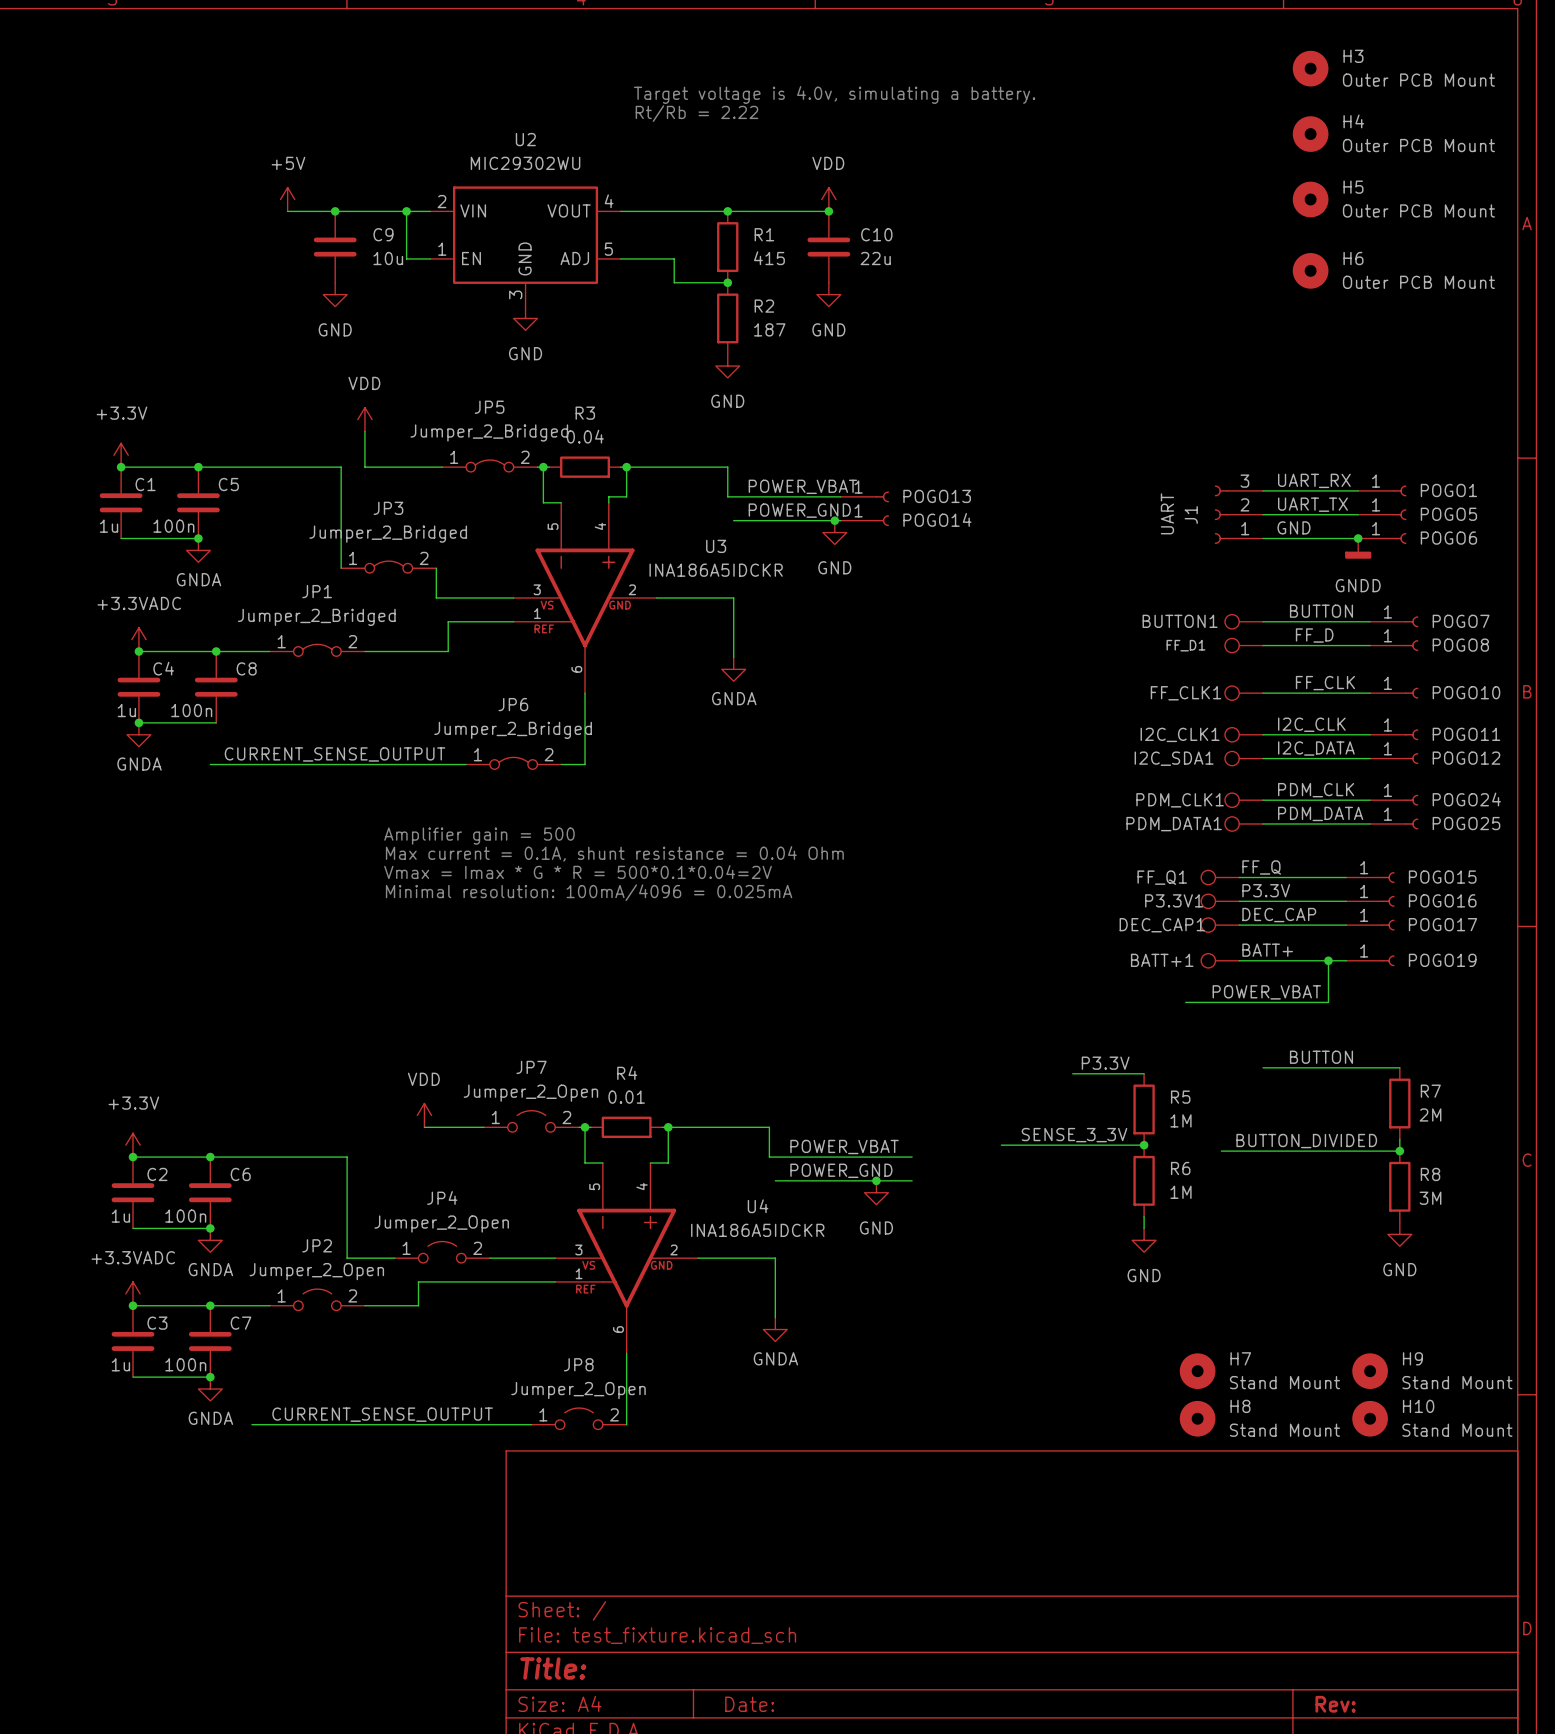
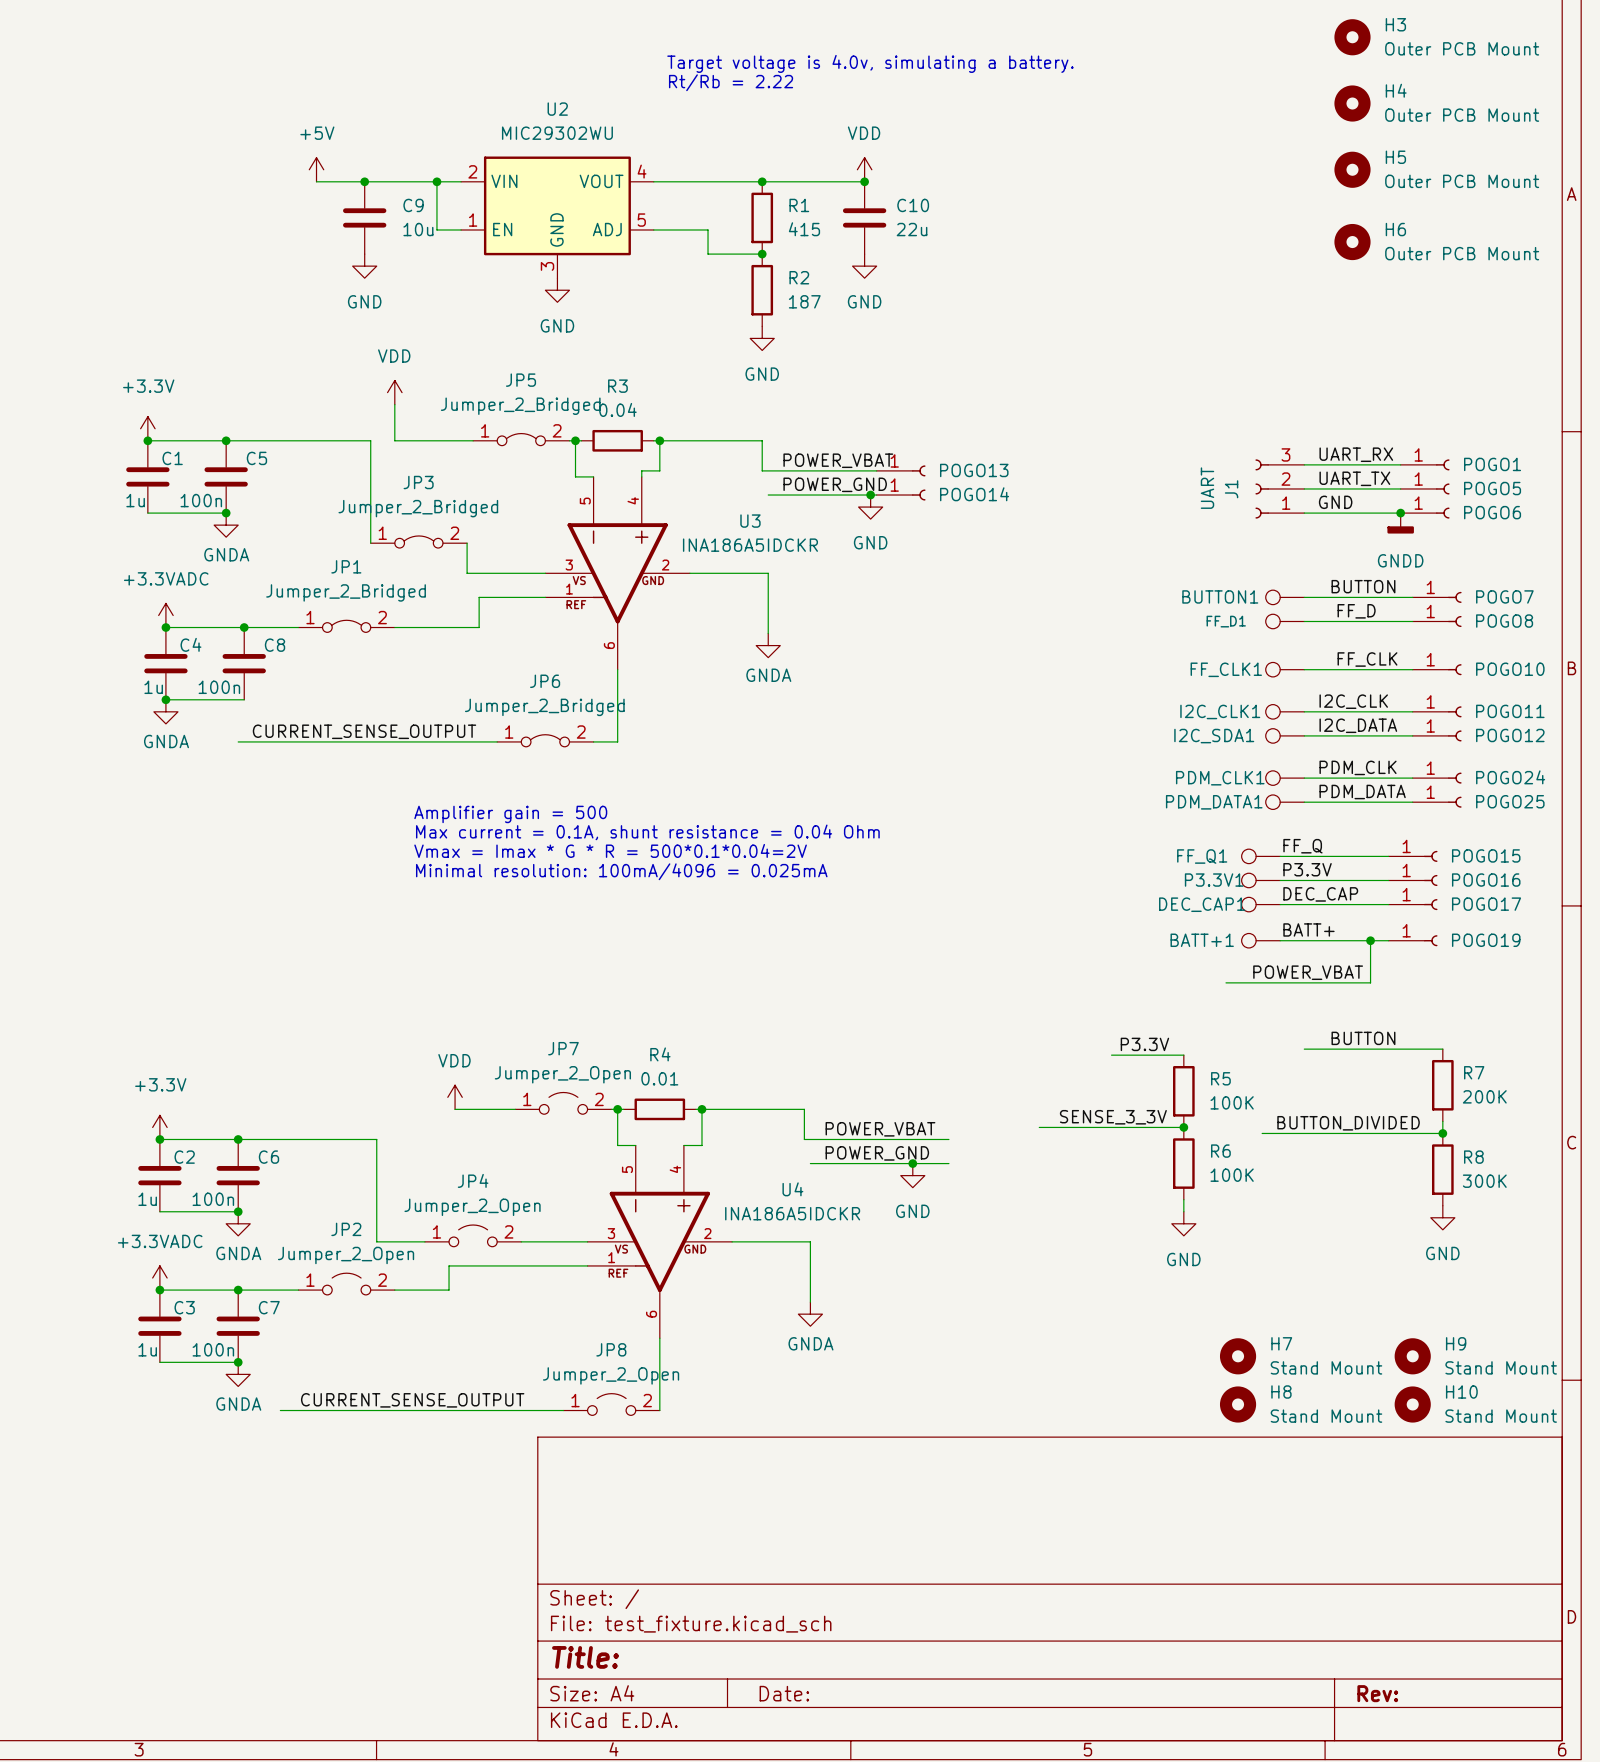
R7 value: 2M (1430, 1114) -> 200K (1484, 1096)
R5 value: 1M (1180, 1120) -> 100K (1232, 1102)
R6 value: 1M (1180, 1192) -> 100K (1232, 1175)
R8 value: 3M (1430, 1198) -> 300K (1484, 1181)

